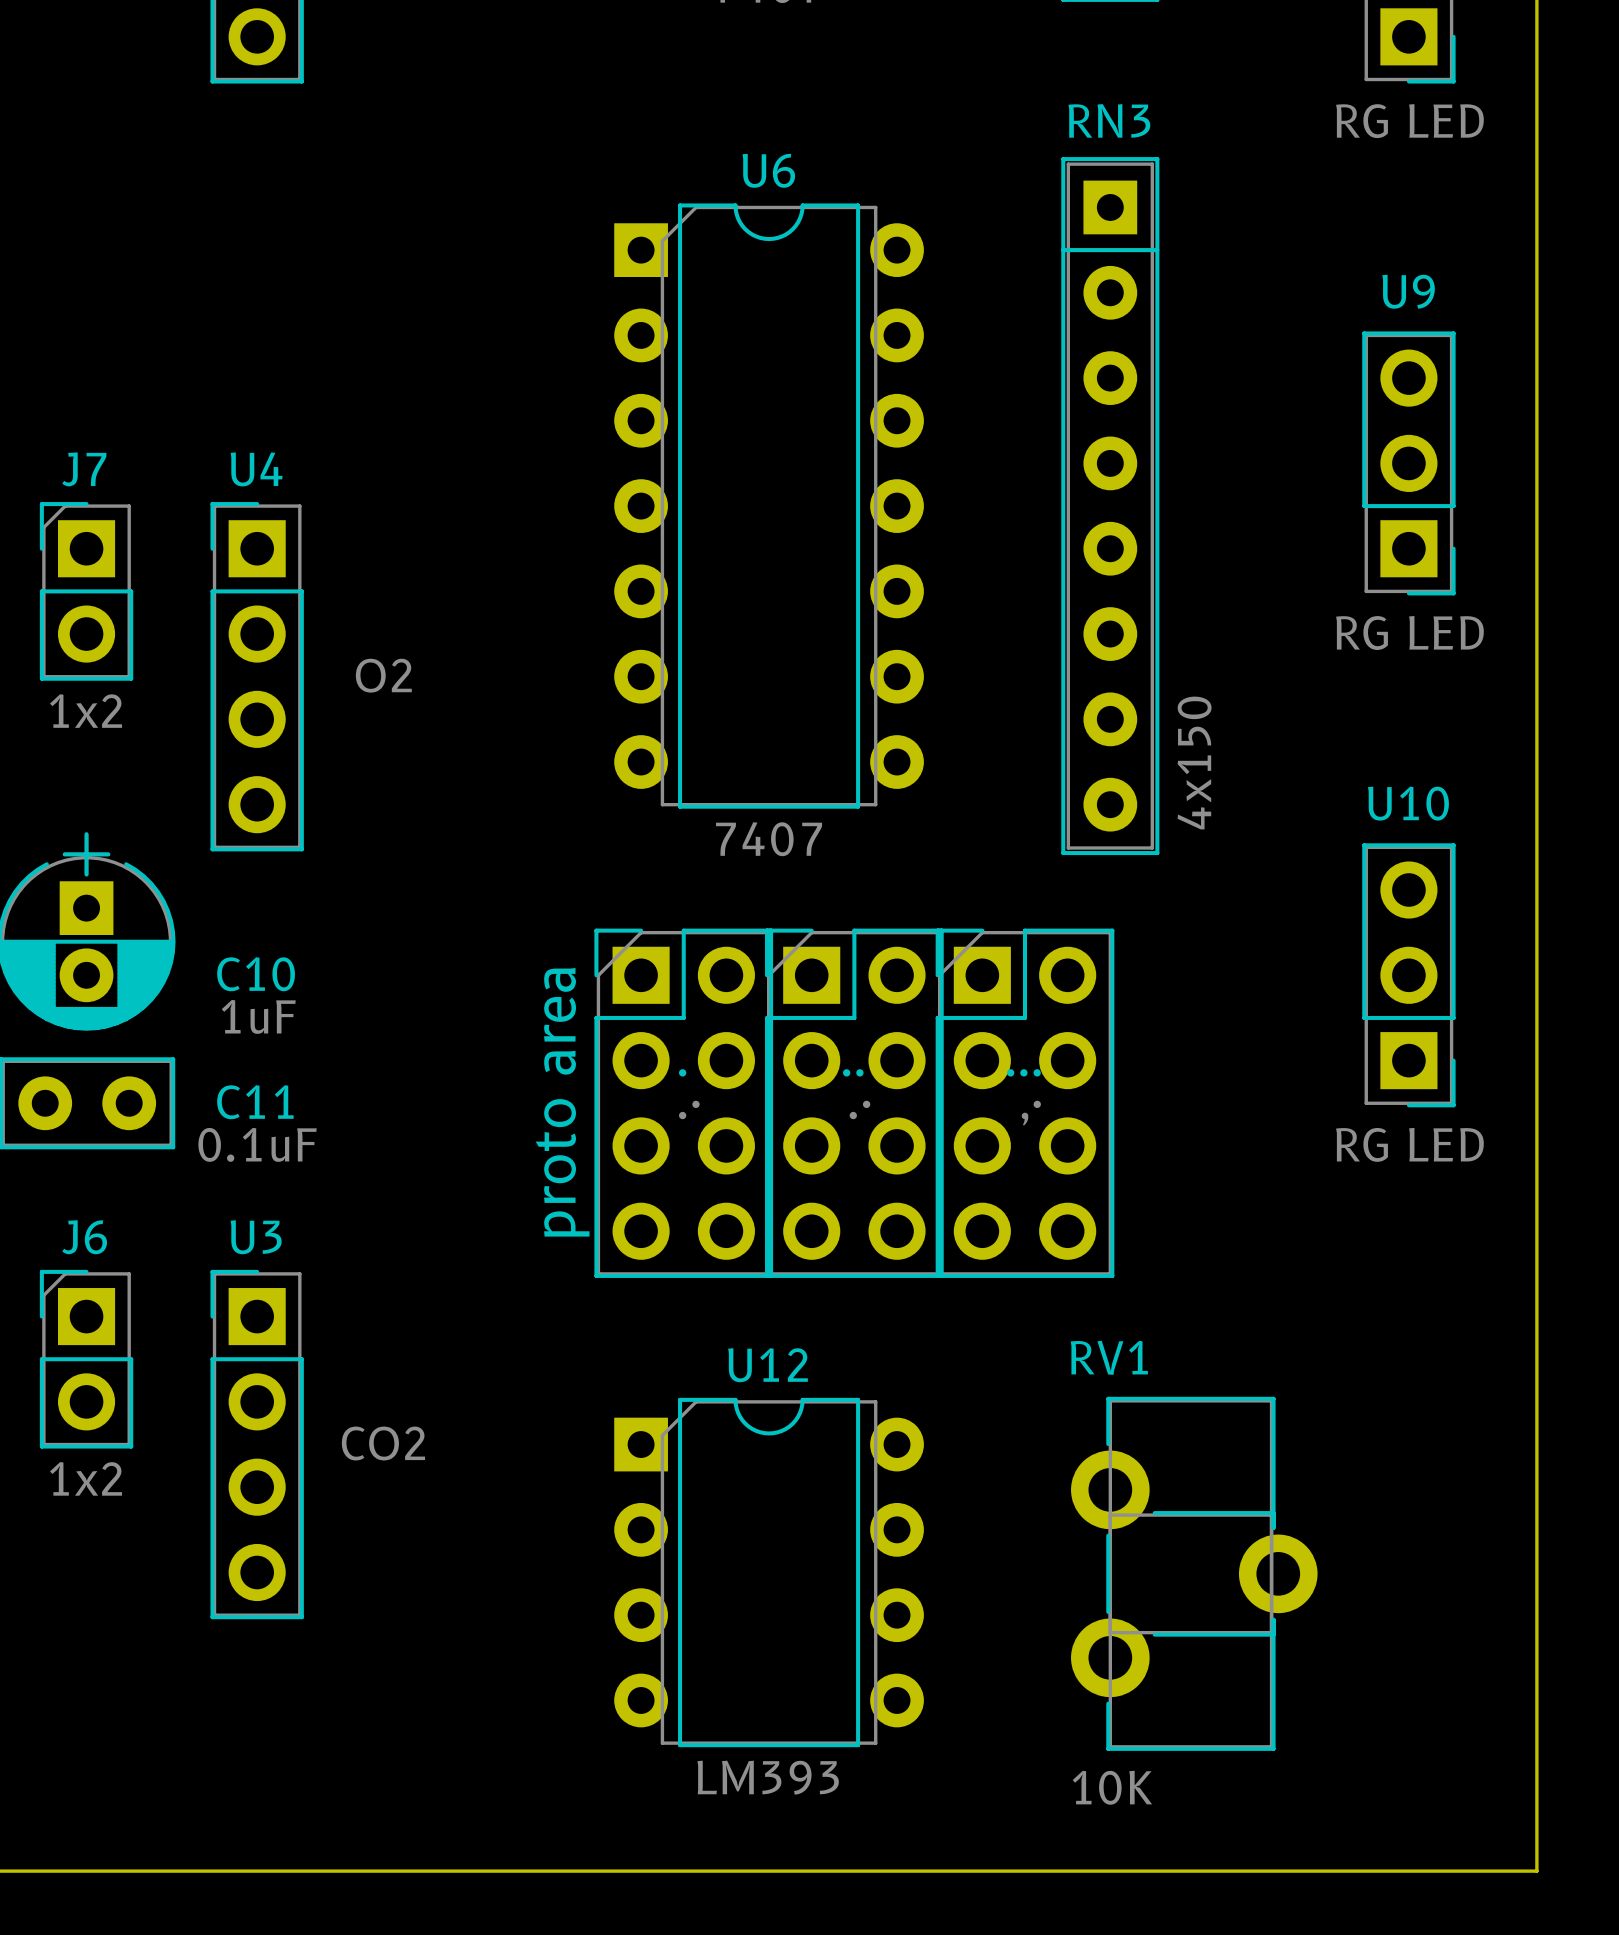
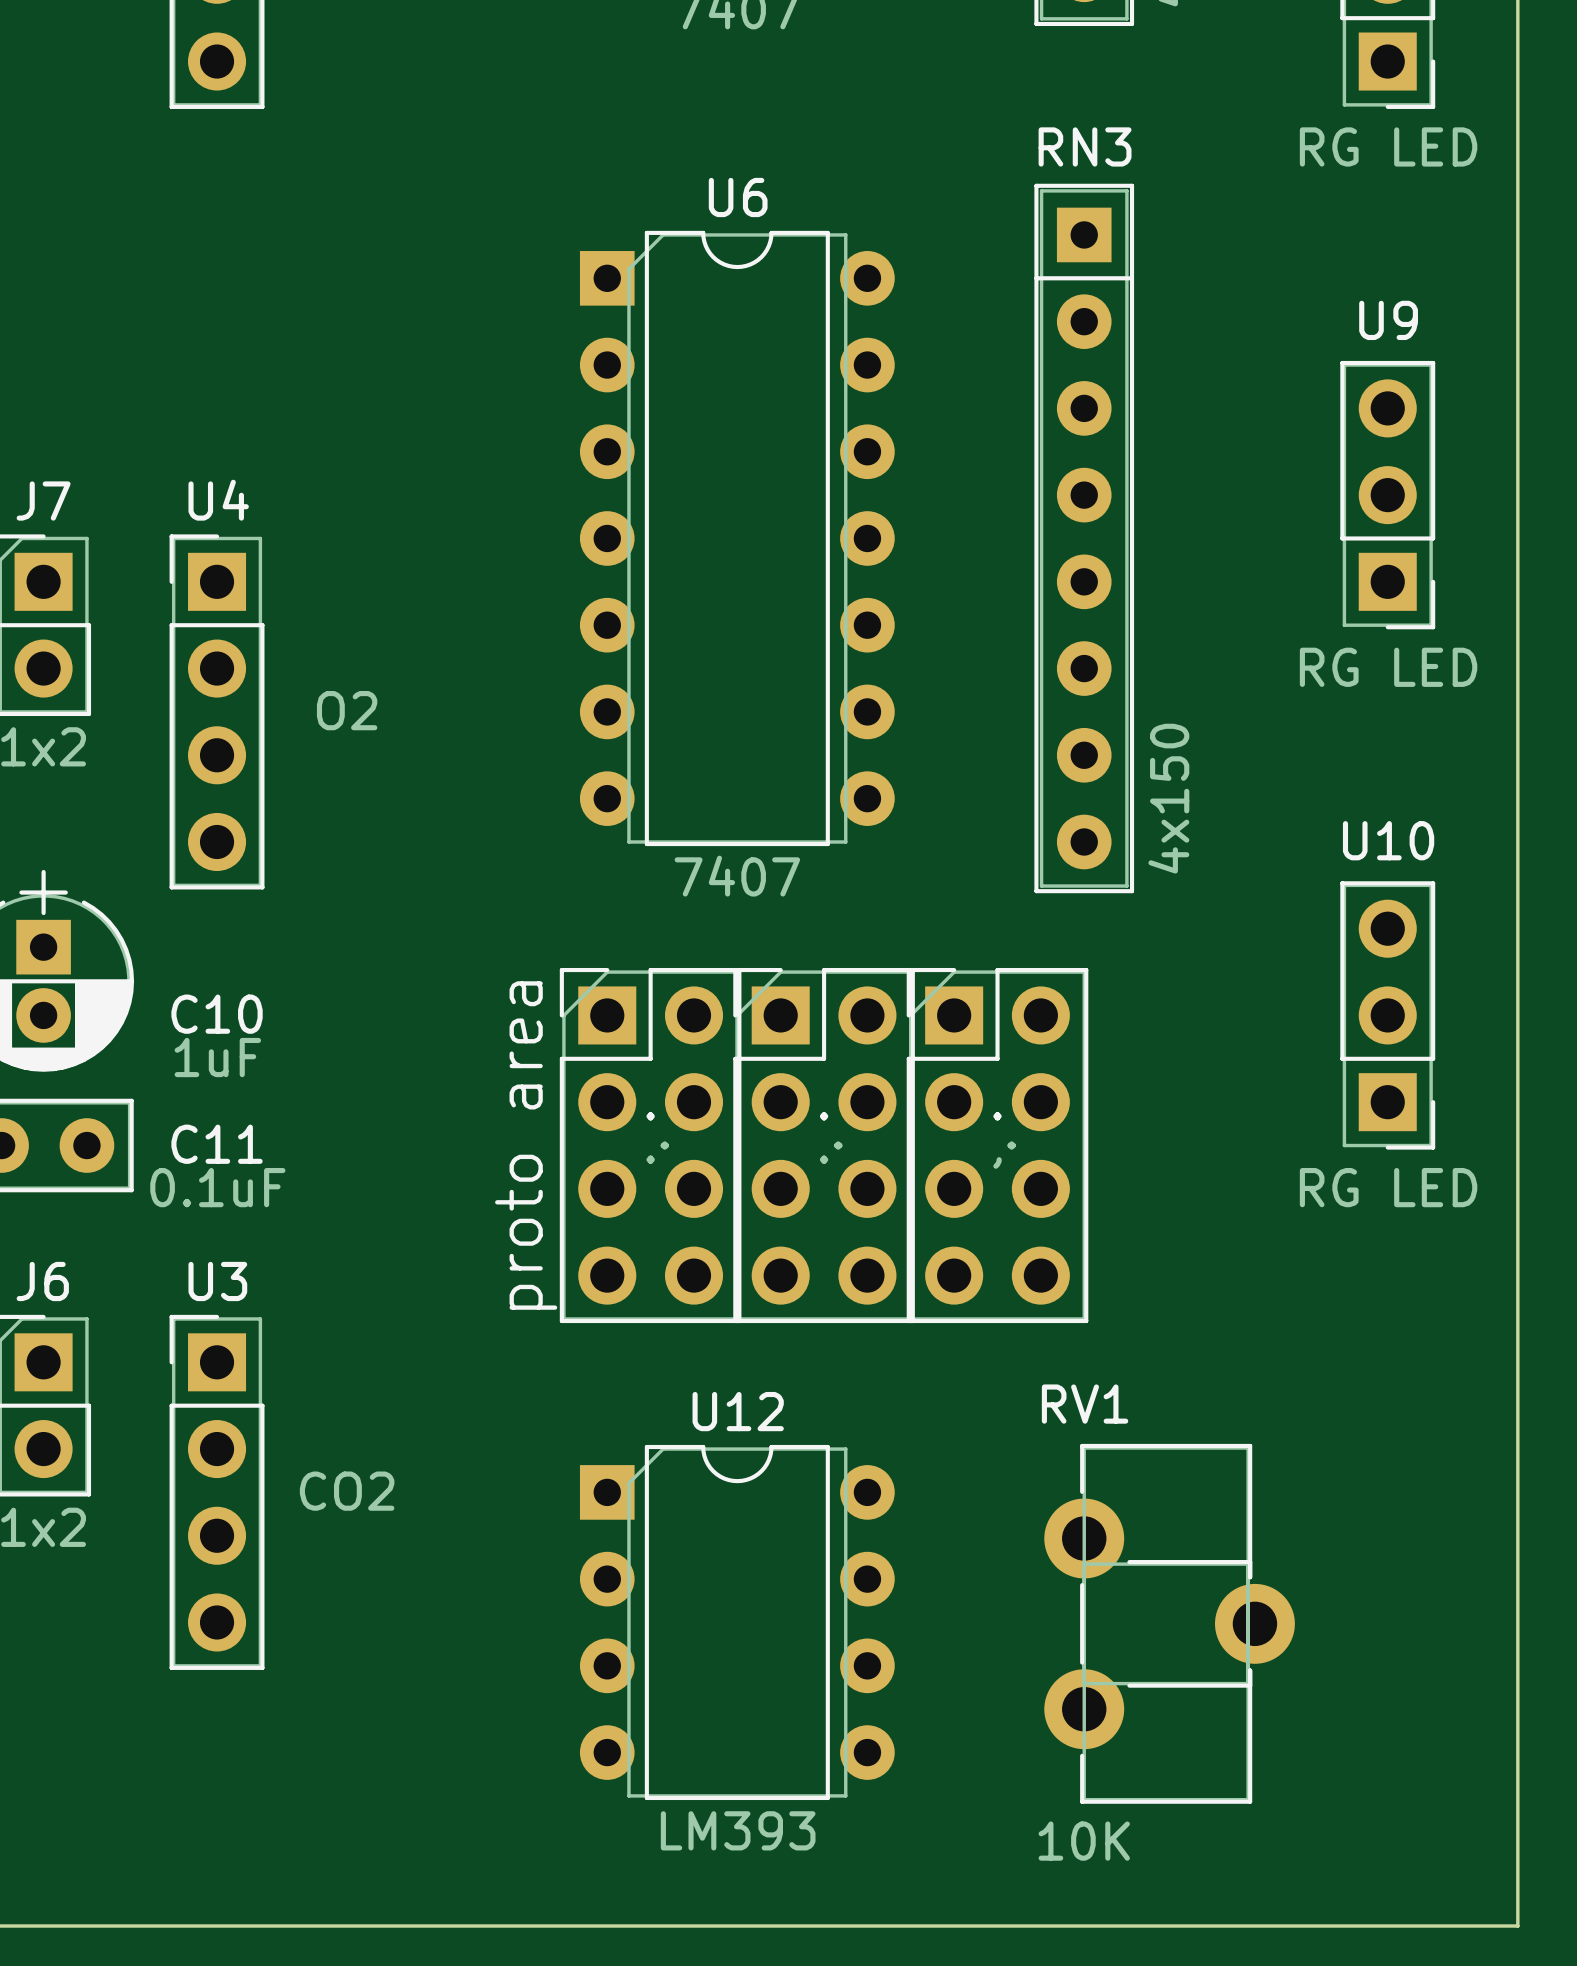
part name: .. (853, 1072) -> . (824, 1116)
part name: ... (1023, 1072) -> . (997, 1116)

